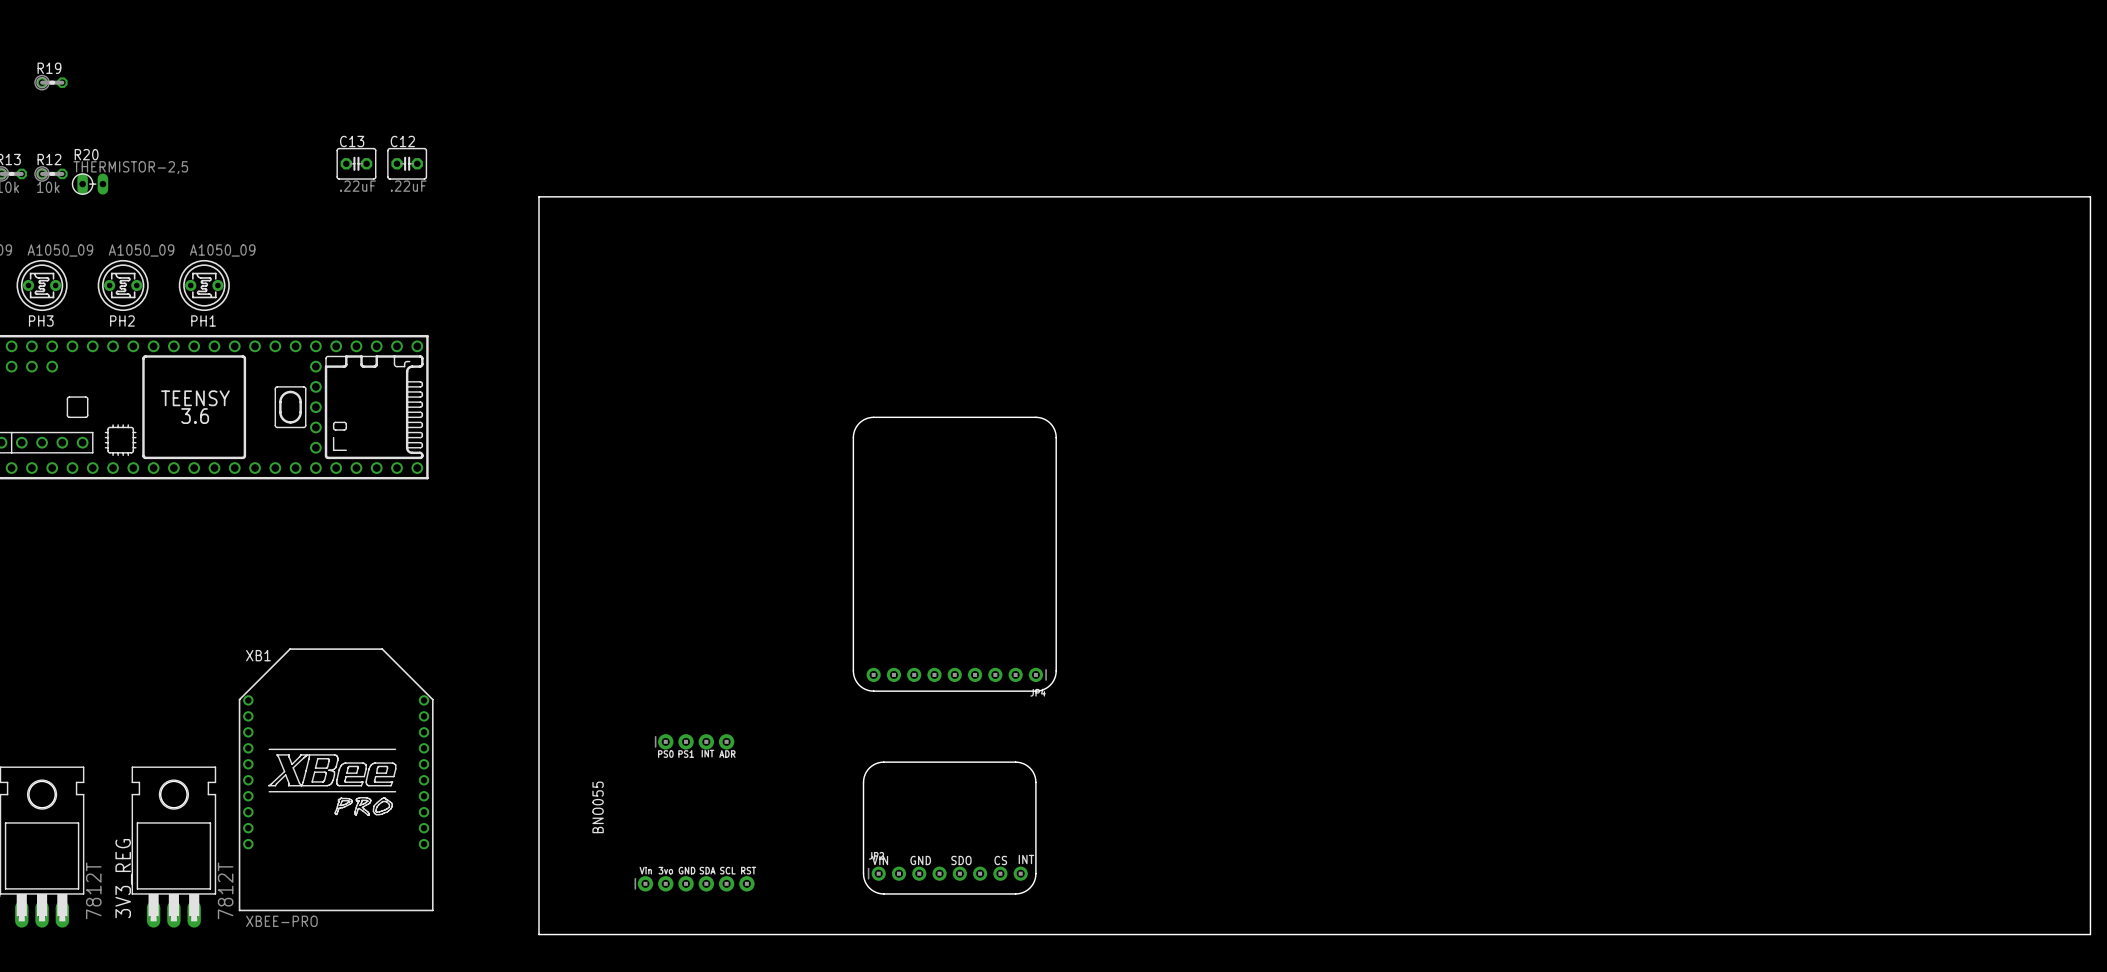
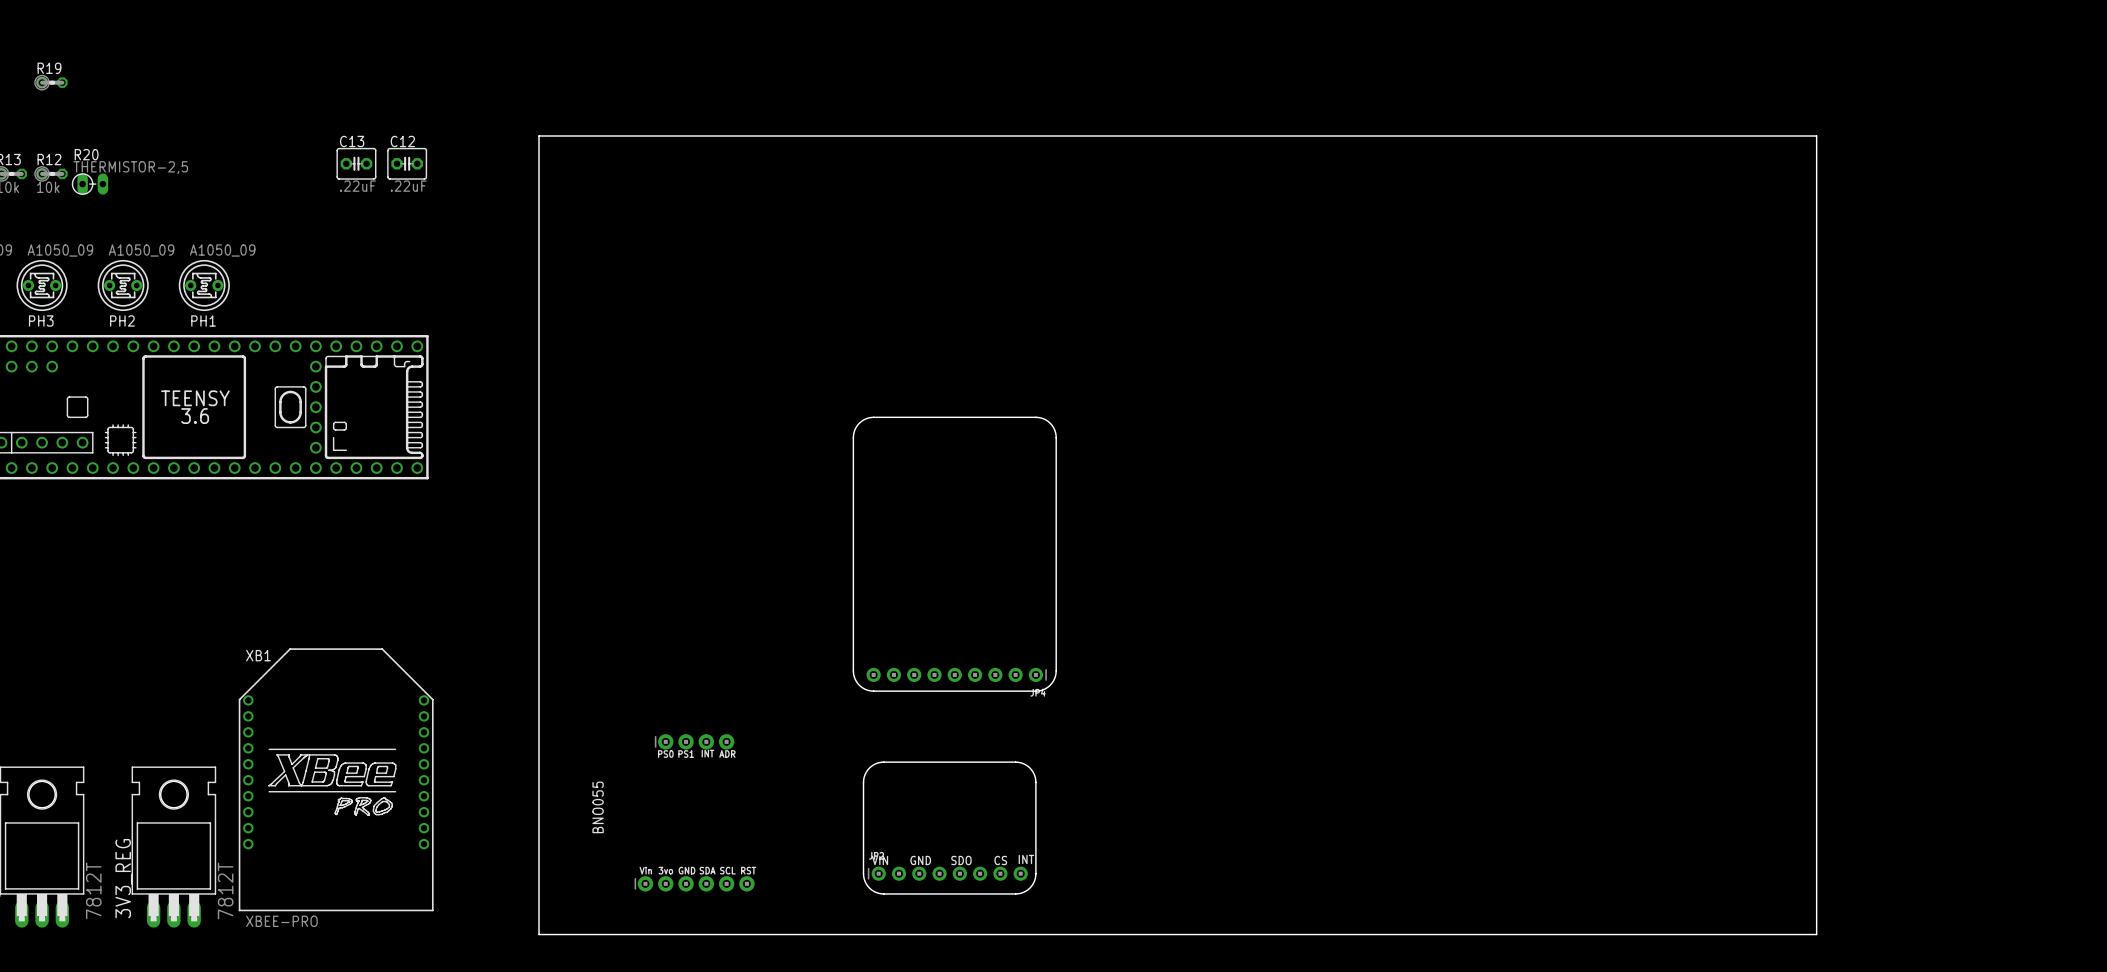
board edge: (538, 196) (2090, 196) (2090, 934) (1816, 934) -> (538, 196) (538, 136) (1816, 136) (1816, 934)

